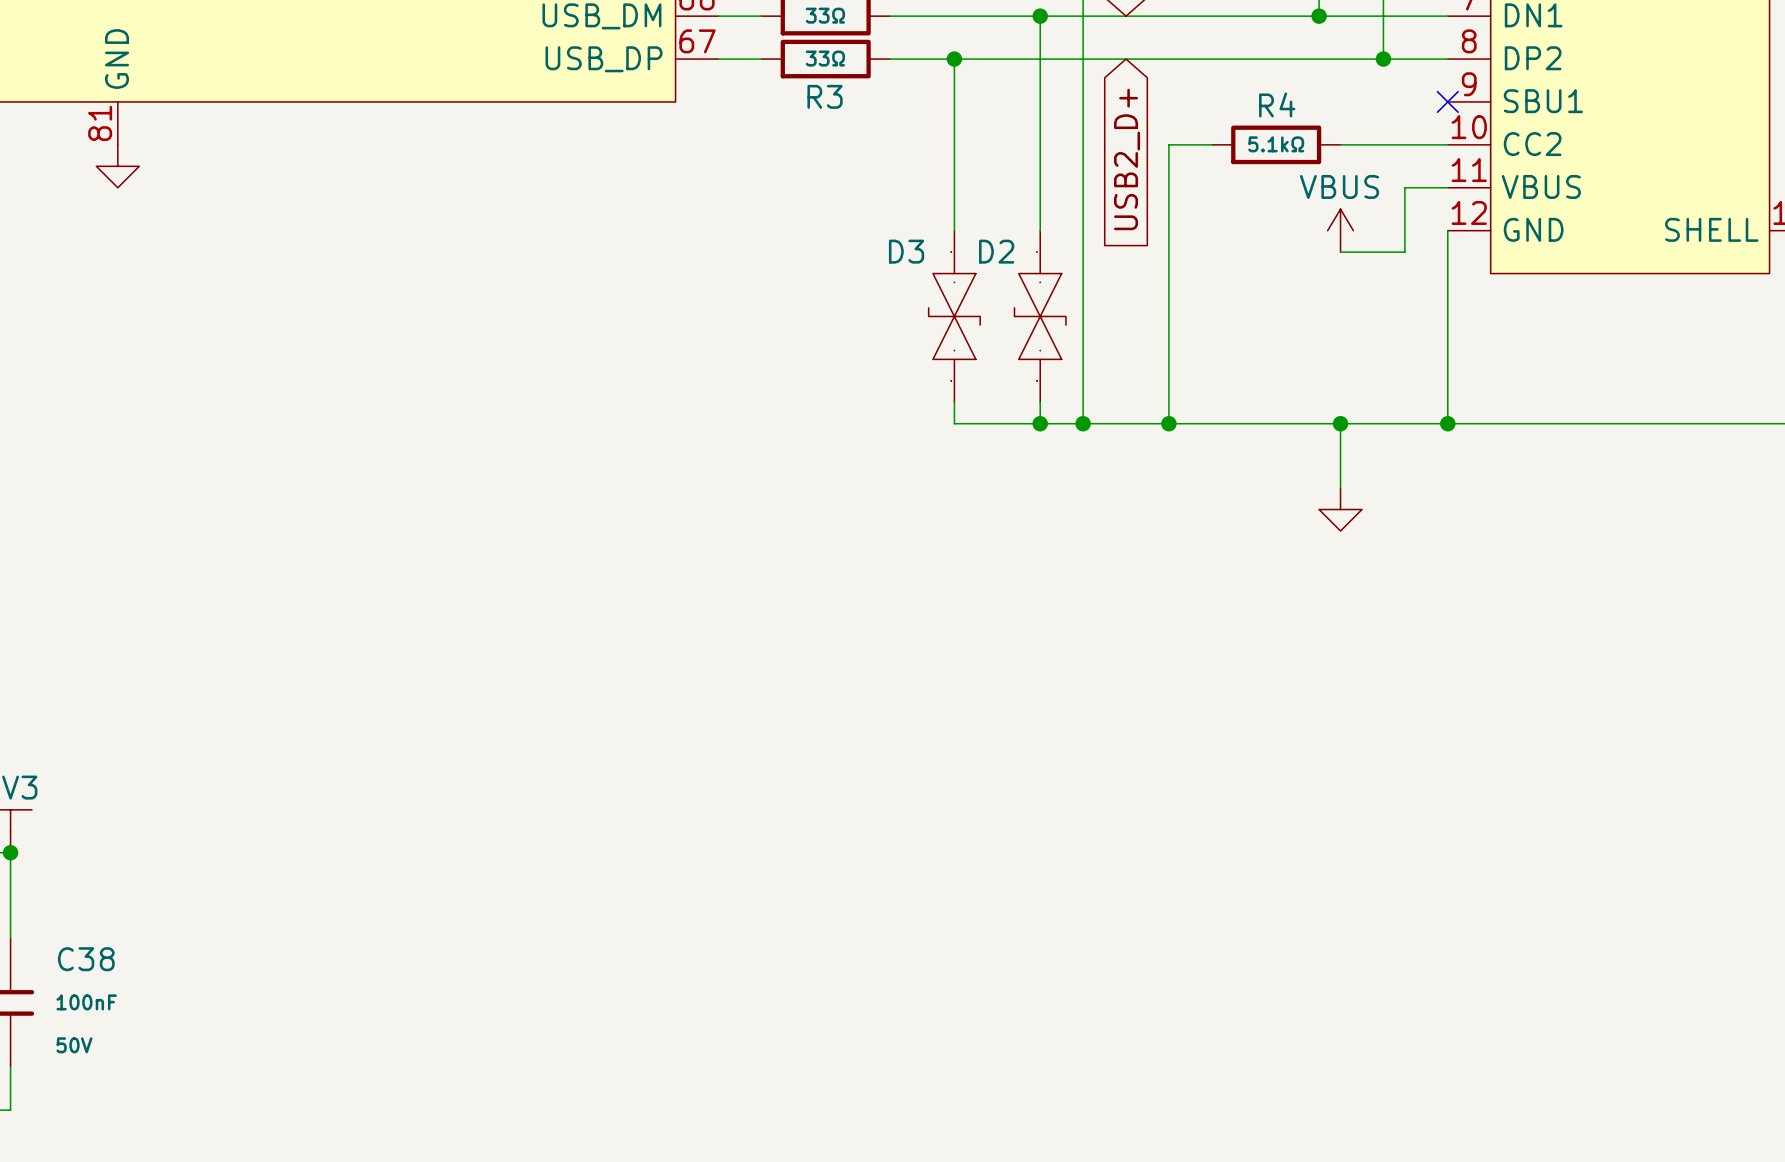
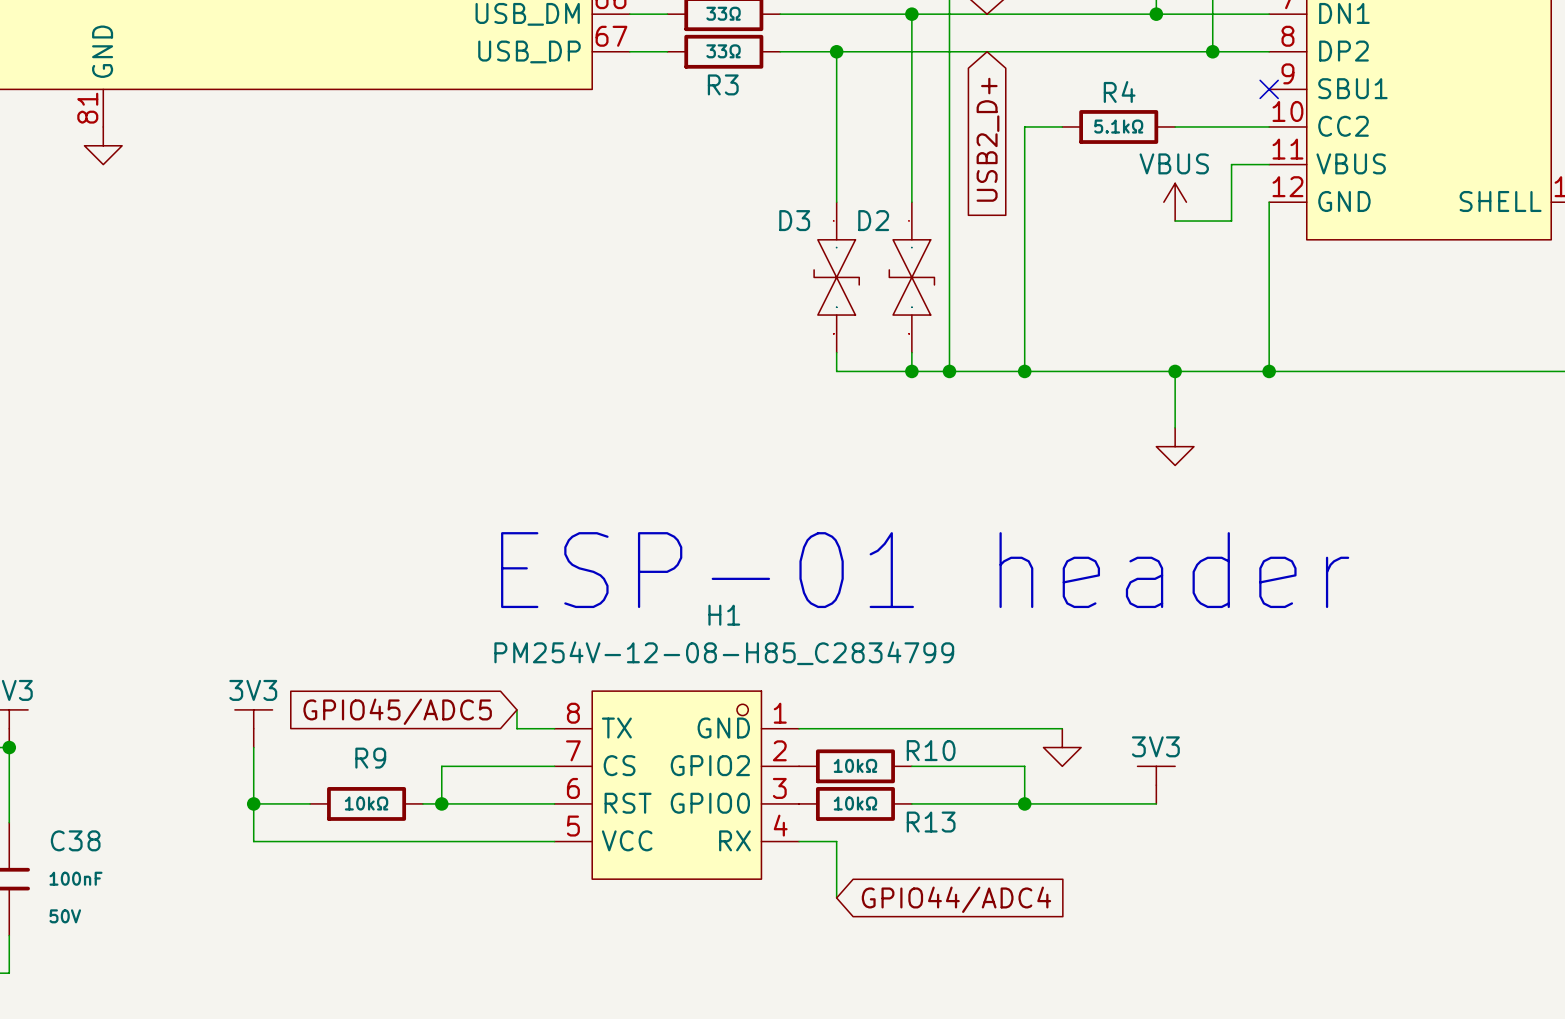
text: none -> ESP-01 header (925, 570)
wire: none -> (516, 709) (516, 728) (554, 728)
global label: none -> GPIO45/ADC5 (397, 711)
power symbol: none -> 3V3 (253, 728)
wire: none -> (799, 728) (1062, 728)
wire: none -> (253, 747) (253, 841) (554, 841)
power symbol: none -> (1062, 747)
wire: none -> (554, 766) (441, 766) (441, 803)
R10: none -> 10kΩ (855, 766)
wire: none -> (911, 766) (1024, 766) (1024, 803)
H1: none -> PM254V-12-08-H85_C2834799 (676, 785)
power symbol: none -> 3V3 (1156, 785)
wire: none -> (253, 803) (310, 803)
junction: none -> (253, 803)
R9: none -> 10kΩ (366, 803)
wire: none -> (422, 803) (554, 803)
junction: none -> (441, 803)
R13: none -> 10kΩ (855, 803)
wire: none -> (911, 803) (1156, 803)
junction: none -> (1024, 803)
wire: none -> (799, 841) (836, 841) (836, 897)
global label: none -> GPIO44/ADC4 (956, 899)

